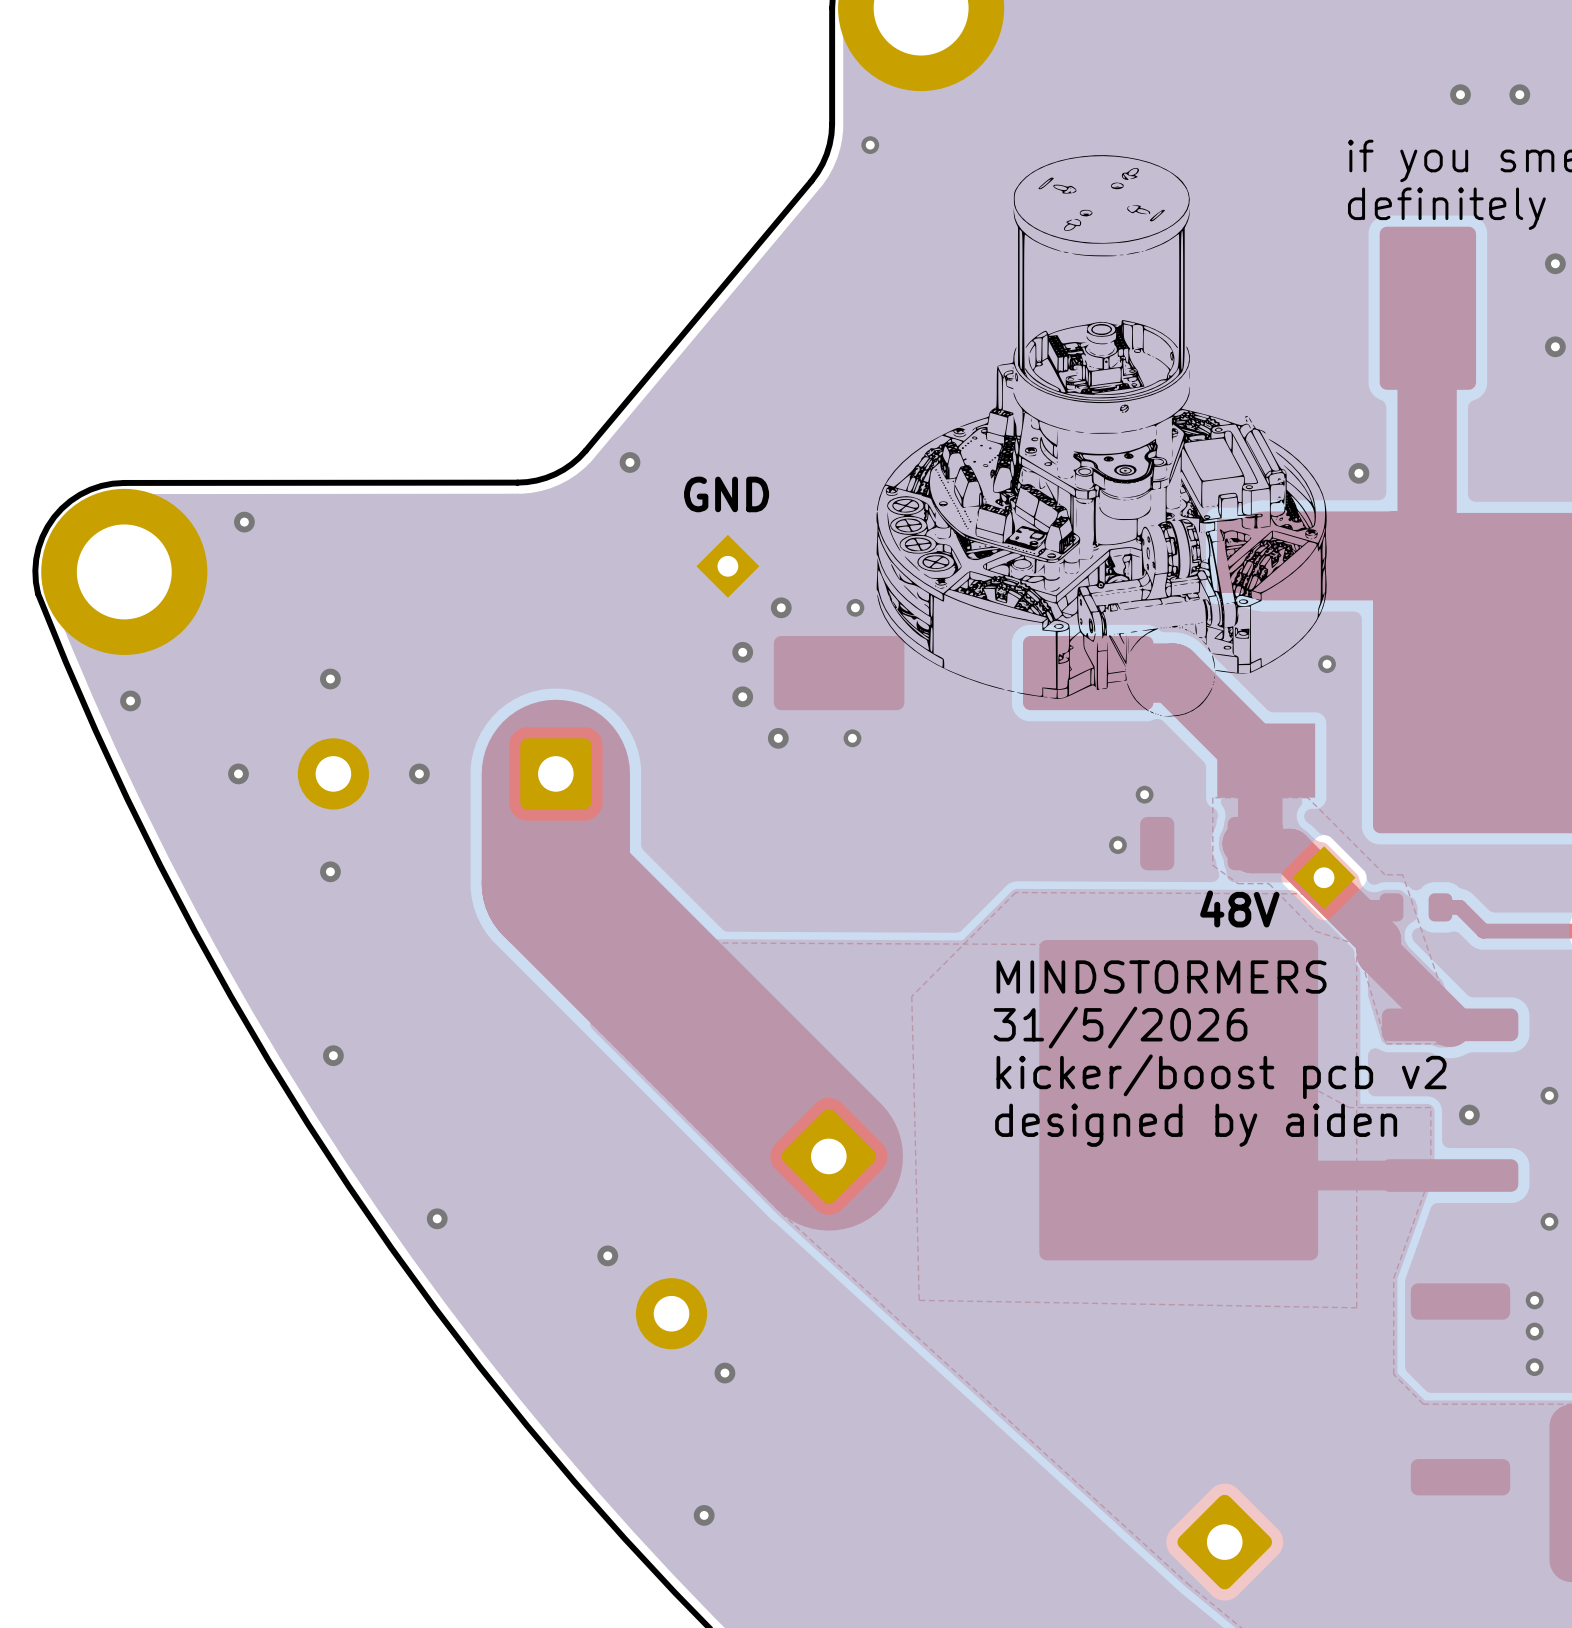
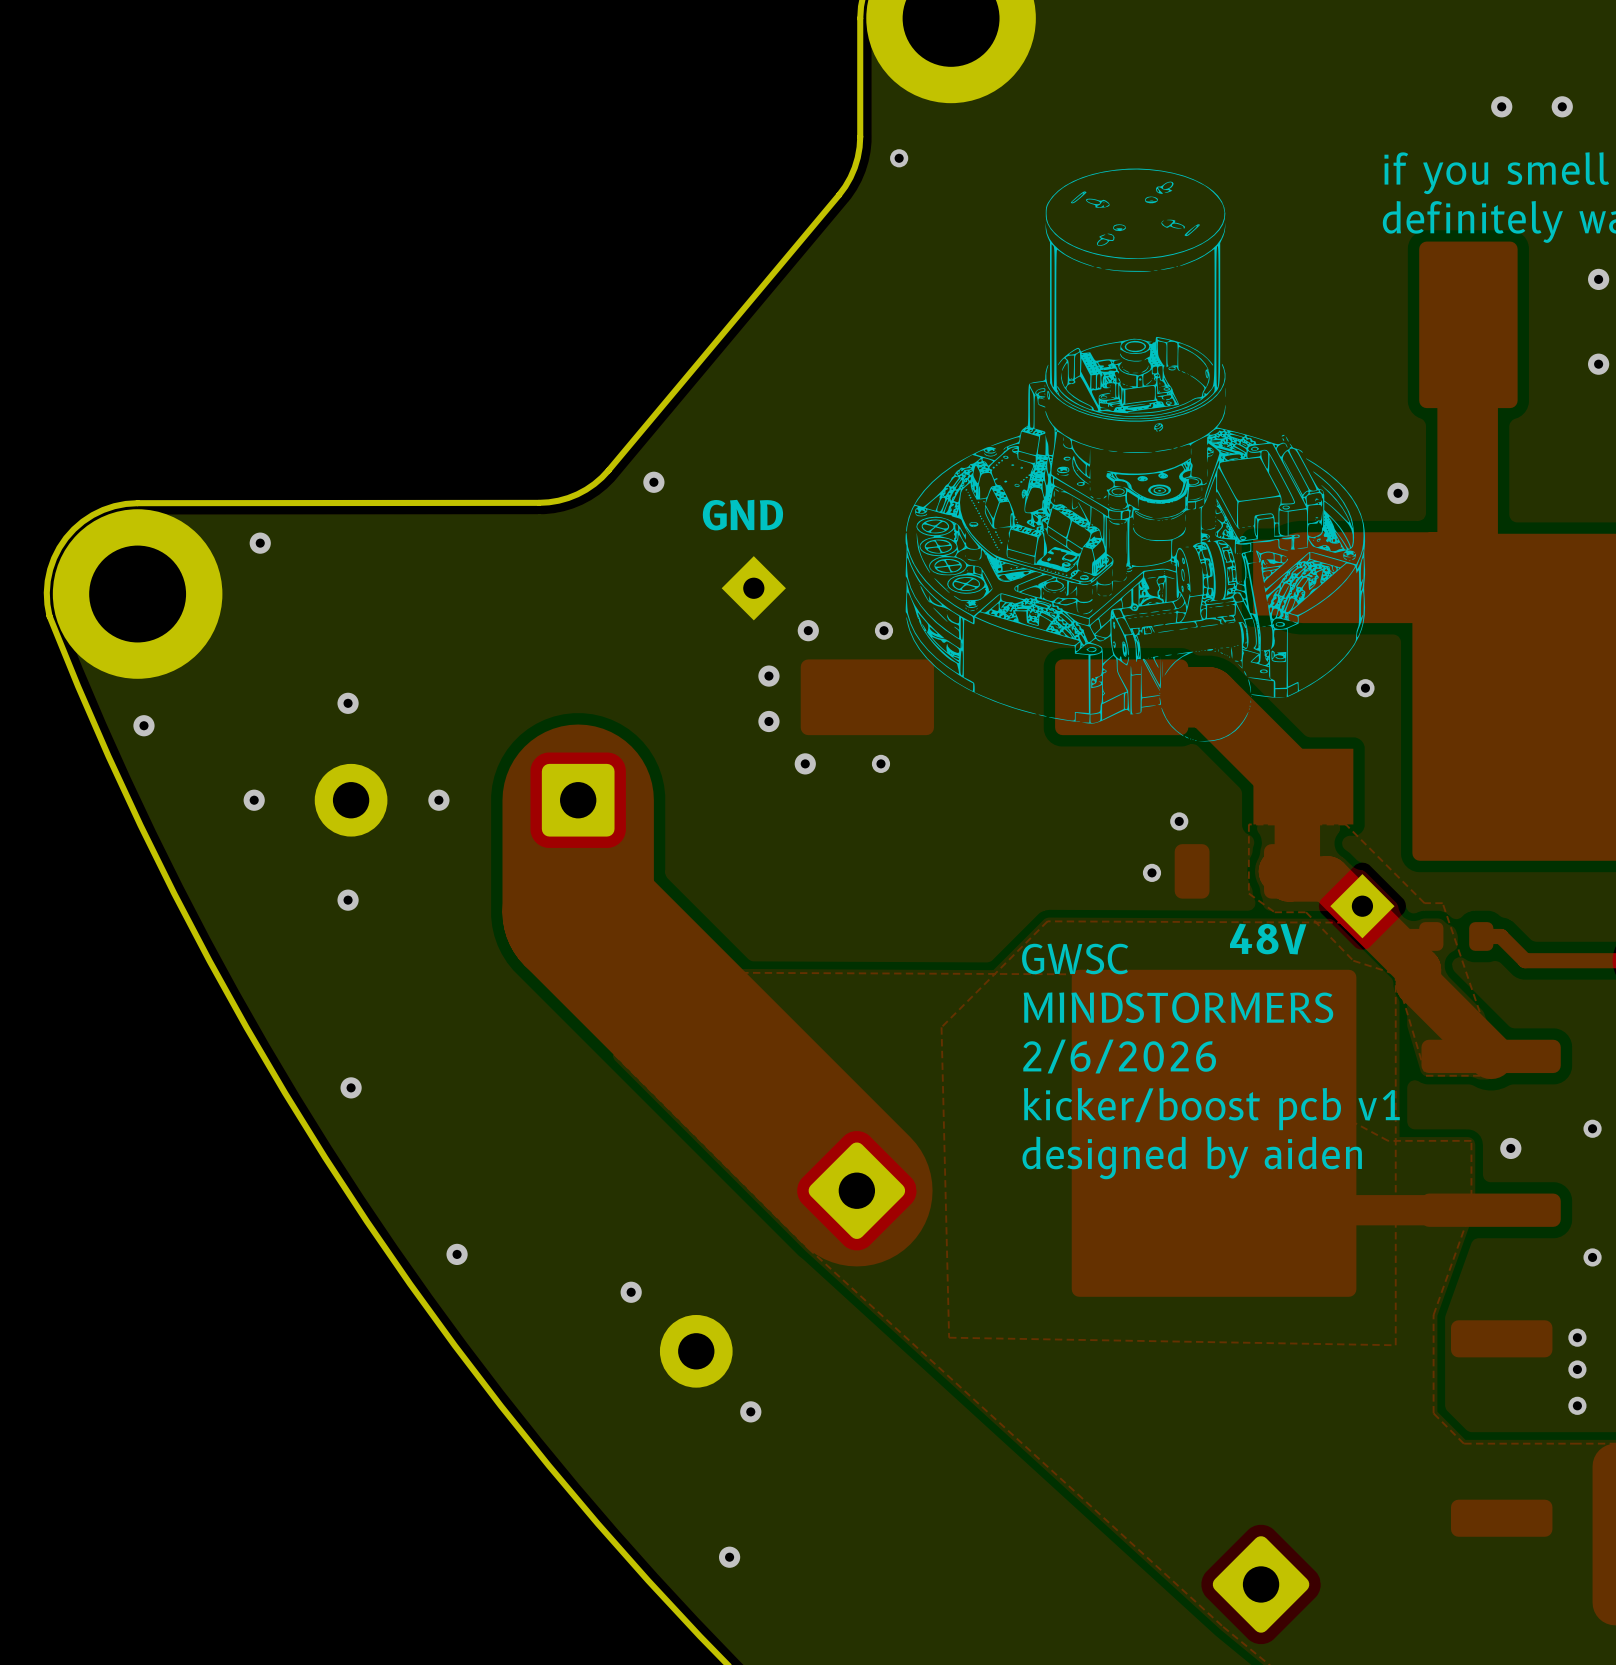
text: none -> GWSC (1075, 958)
text: 31/5/2026 (1120, 1027) -> 2/6/2026 (1119, 1056)
text: kicker/boost pcb v2 (1221, 1076) -> kicker/boost pcb v1 (1211, 1109)

